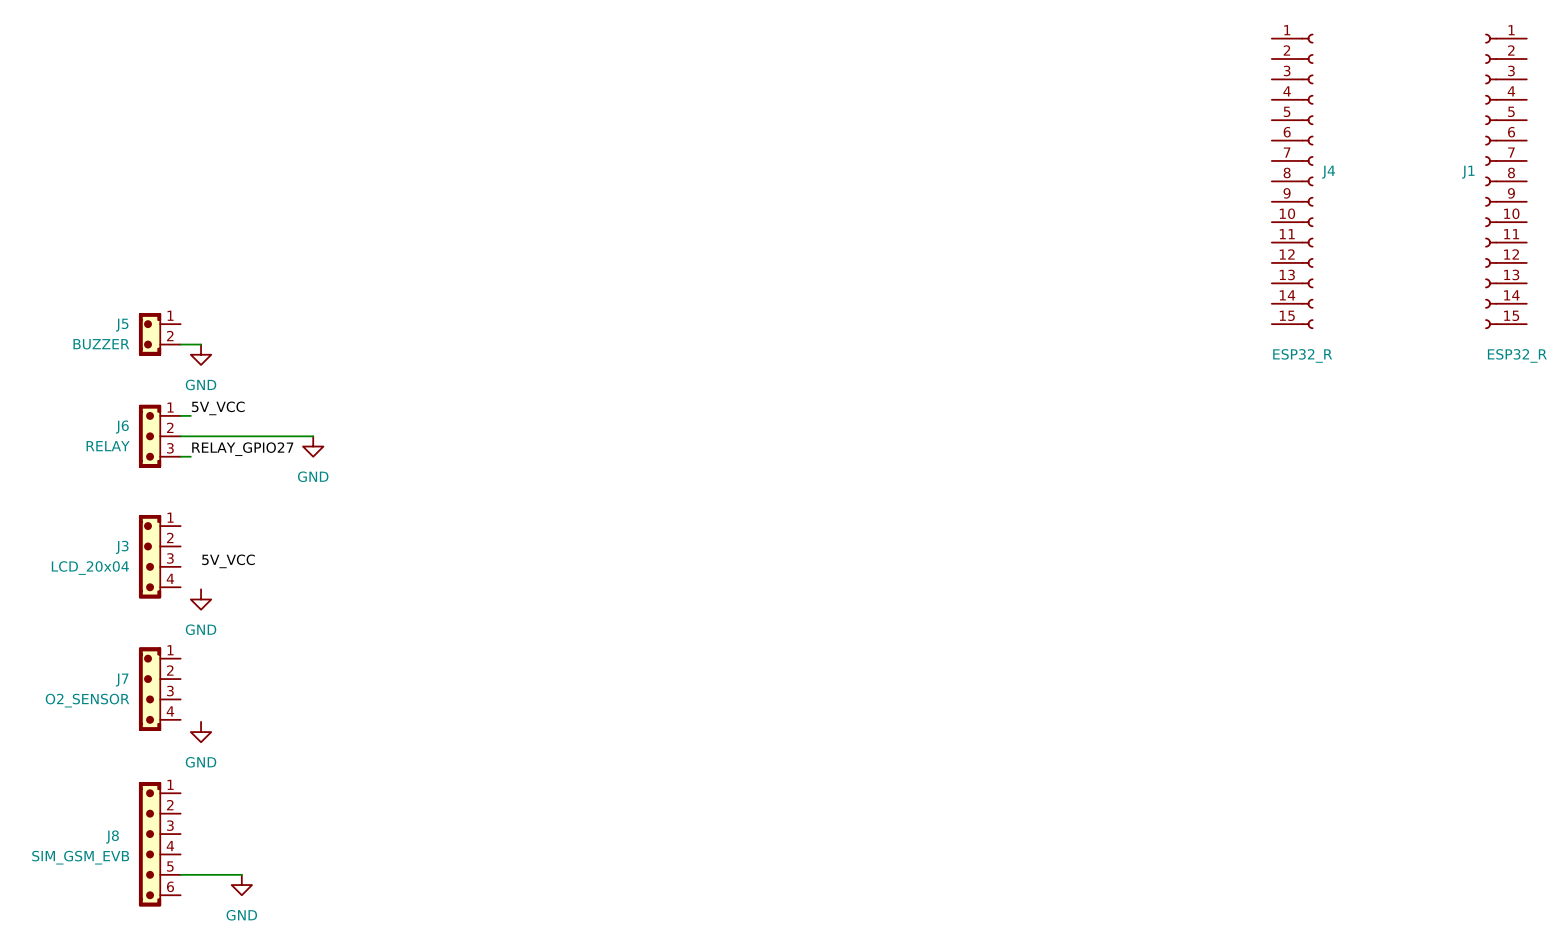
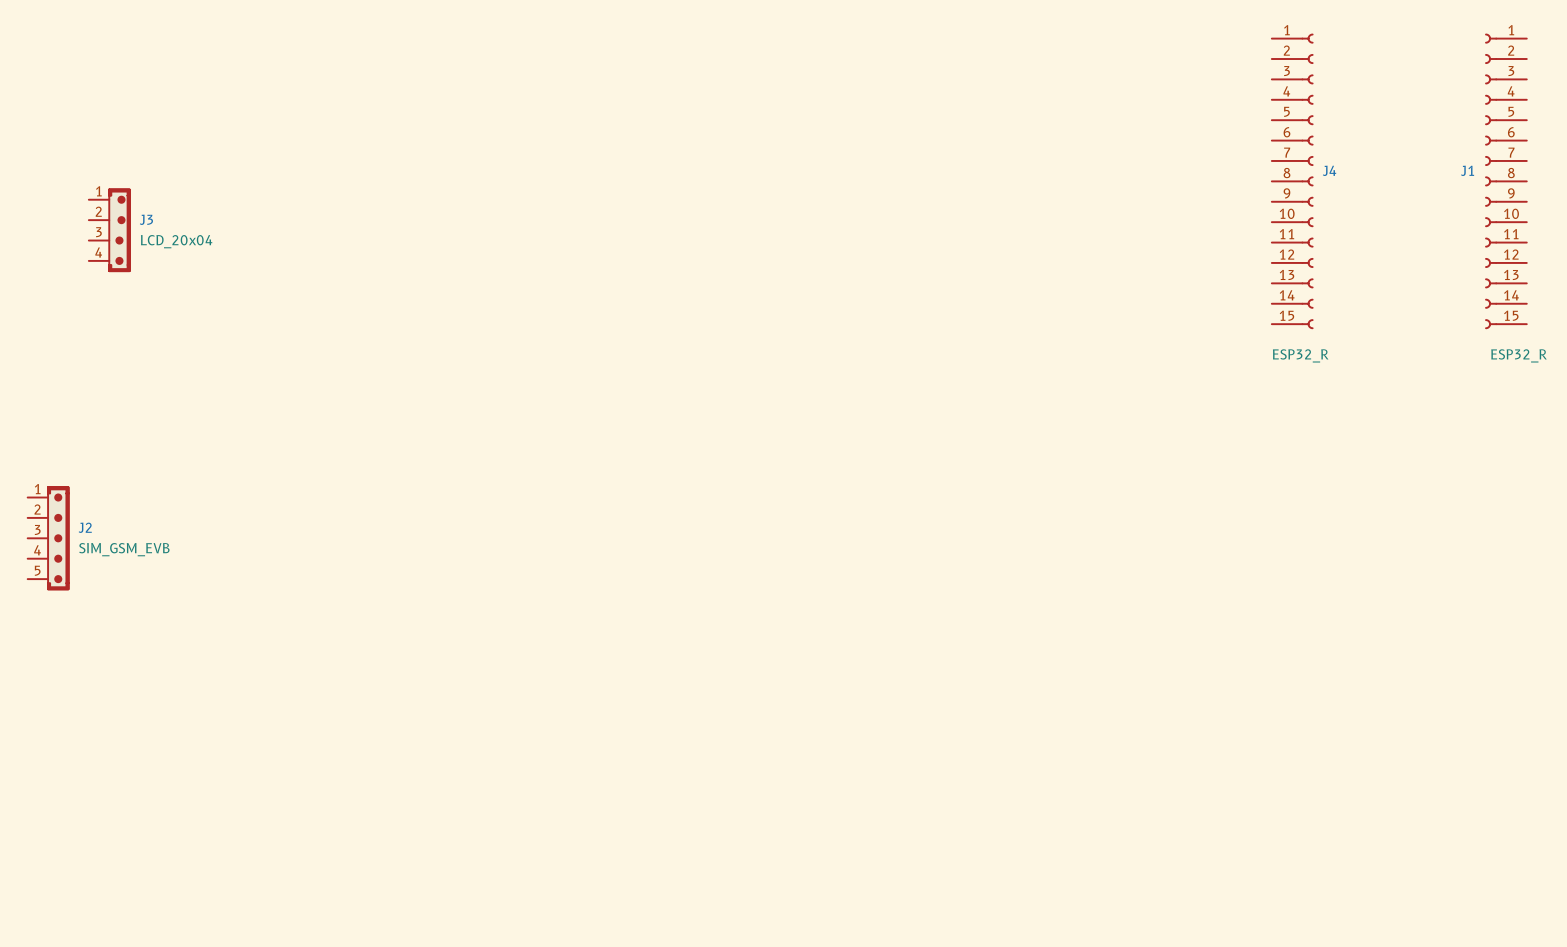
J5: BUZZER (160, 334) -> none
wire: (180, 344) (201, 344) -> none
power symbol: GND (201, 354) -> none
label: 5V_VCC (218, 408) -> none
wire: (180, 415) (190, 415) -> none
J6: RELAY (160, 436) -> none
wire: (180, 436) (313, 436) -> none
power symbol: GND (313, 446) -> none
label: RELAY_GPIO27 (242, 449) -> none
wire: (180, 456) (190, 456) -> none
J2: none -> SIM_GSM_EVB (48, 538)
J3 flip: as is (150, 556) -> left-right (119, 230)
J3 position: (160, 556) -> (109, 230)
label: 5V_VCC (228, 561) -> none
power symbol: GND (201, 599) -> none
J7: O2_SENSOR (160, 689) -> none
power symbol: GND (201, 732) -> none
J8: SIM_GSM_EVB (160, 844) -> none
wire: (180, 874) (241, 874) -> none
power symbol: GND (241, 885) -> none

